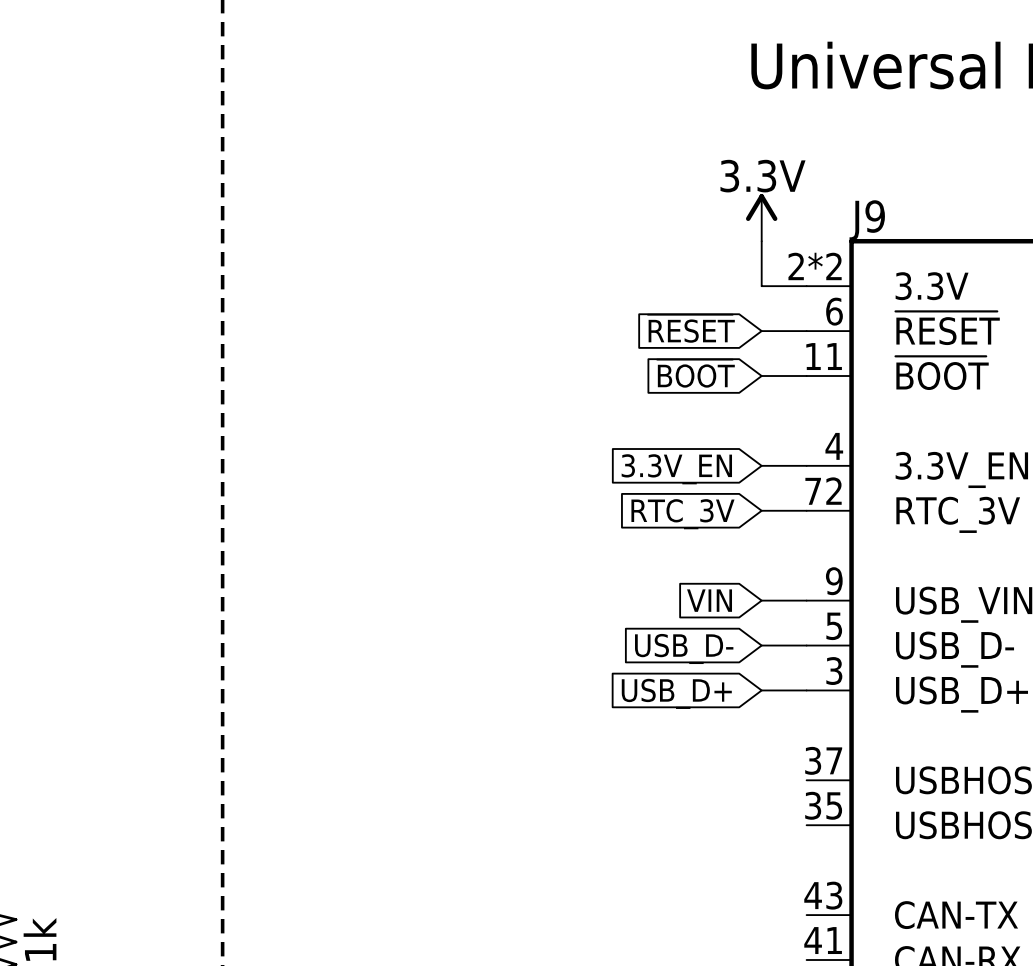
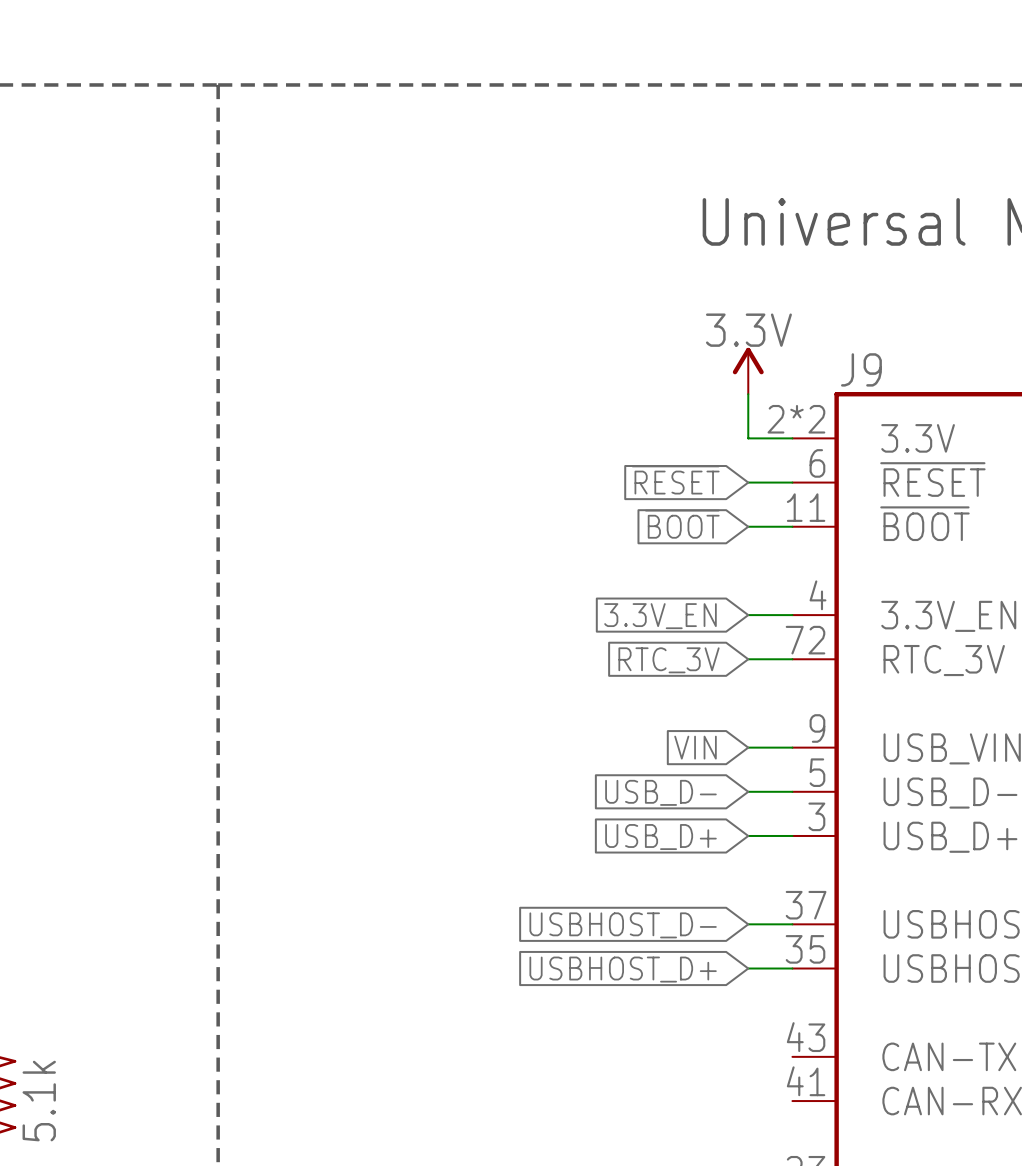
wire: none -> (748, 924) (792, 924)
global label: none -> USBHOST_D- (623, 925)
wire: none -> (748, 968) (792, 968)
global label: none -> USBHOST_D+ (623, 969)

